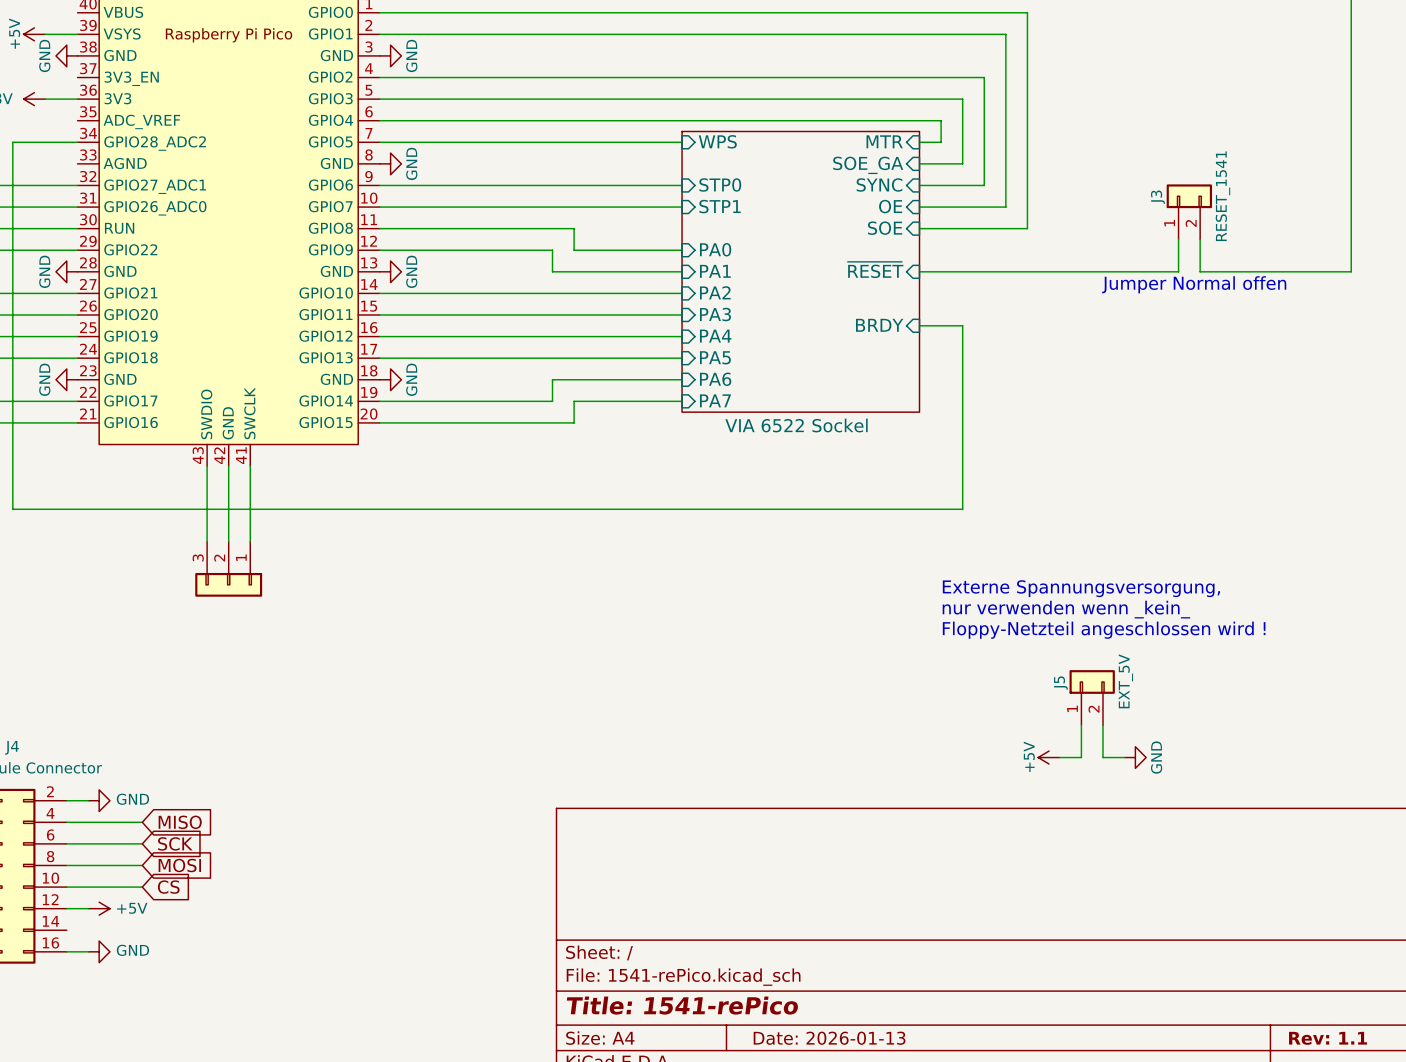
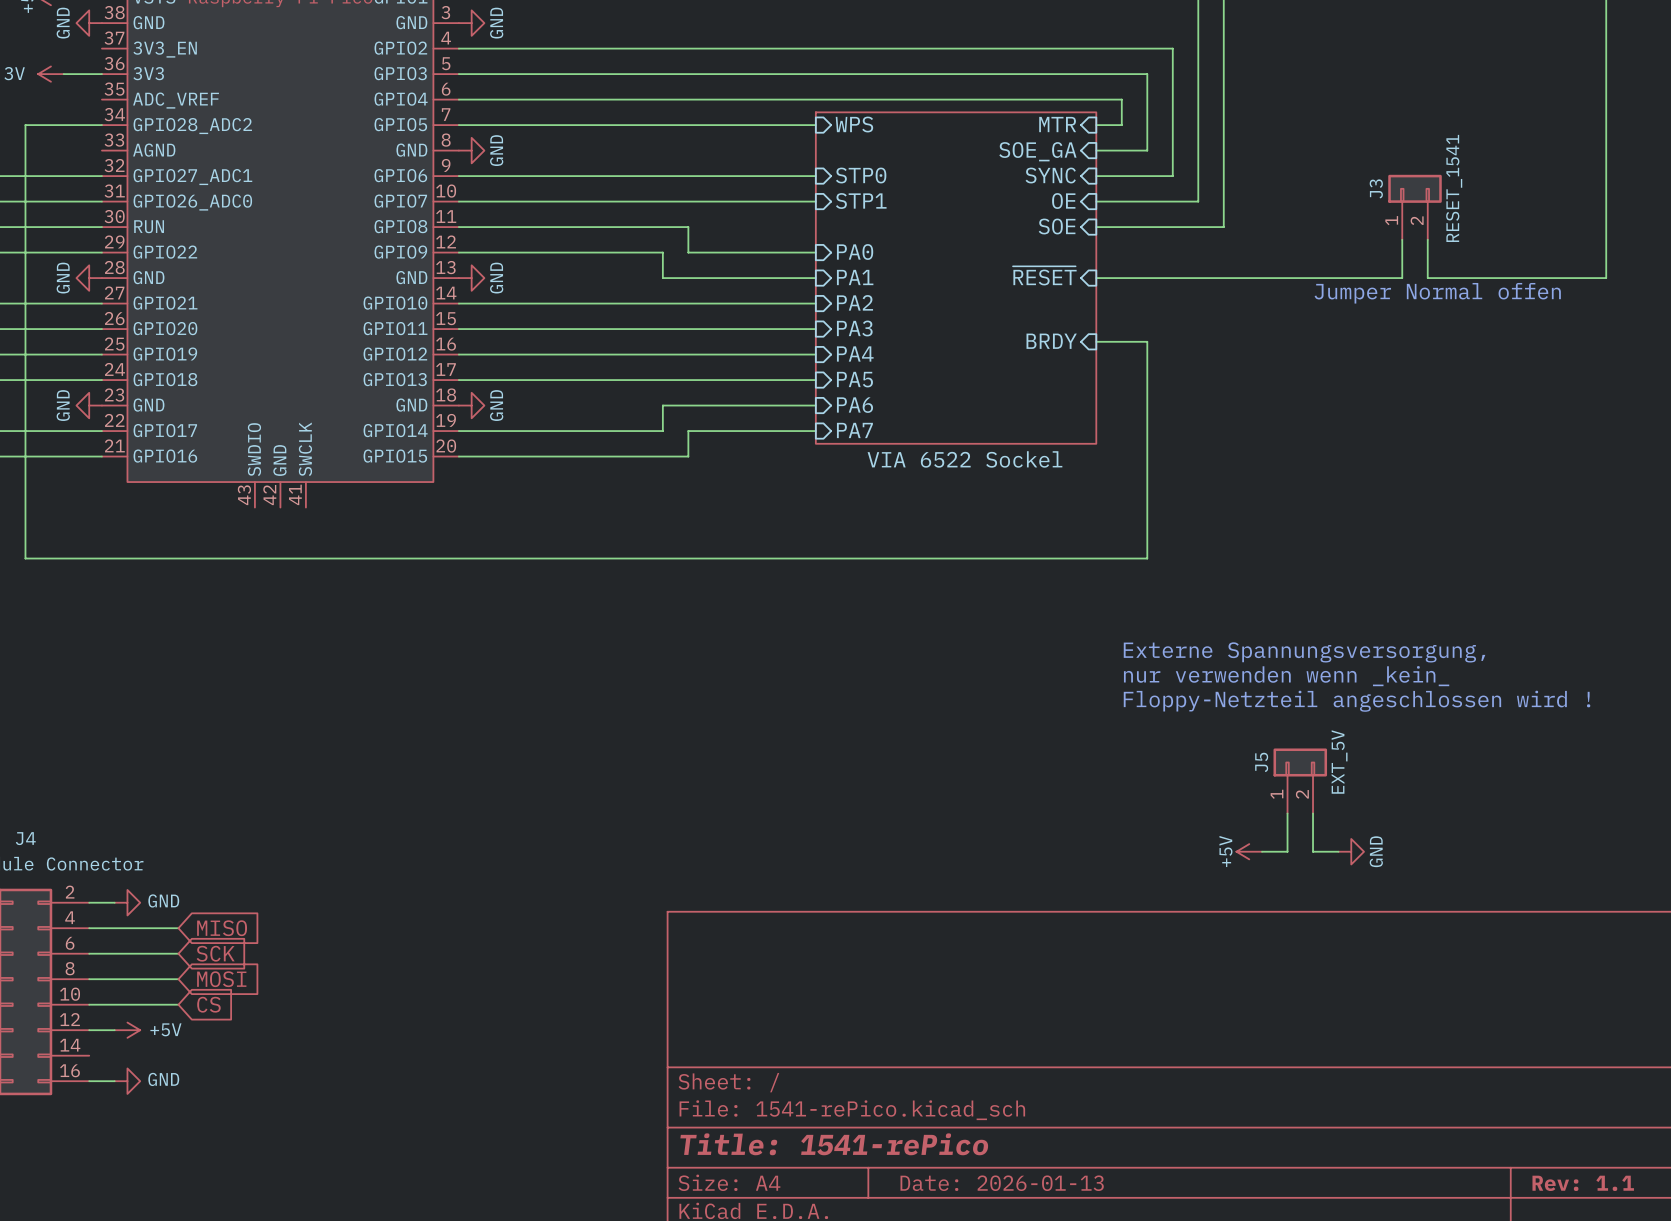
wire: (207, 466) (207, 541) -> none
wire: (228, 466) (228, 541) -> none
wire: (250, 466) (250, 541) -> none
part: (228, 569) -> none

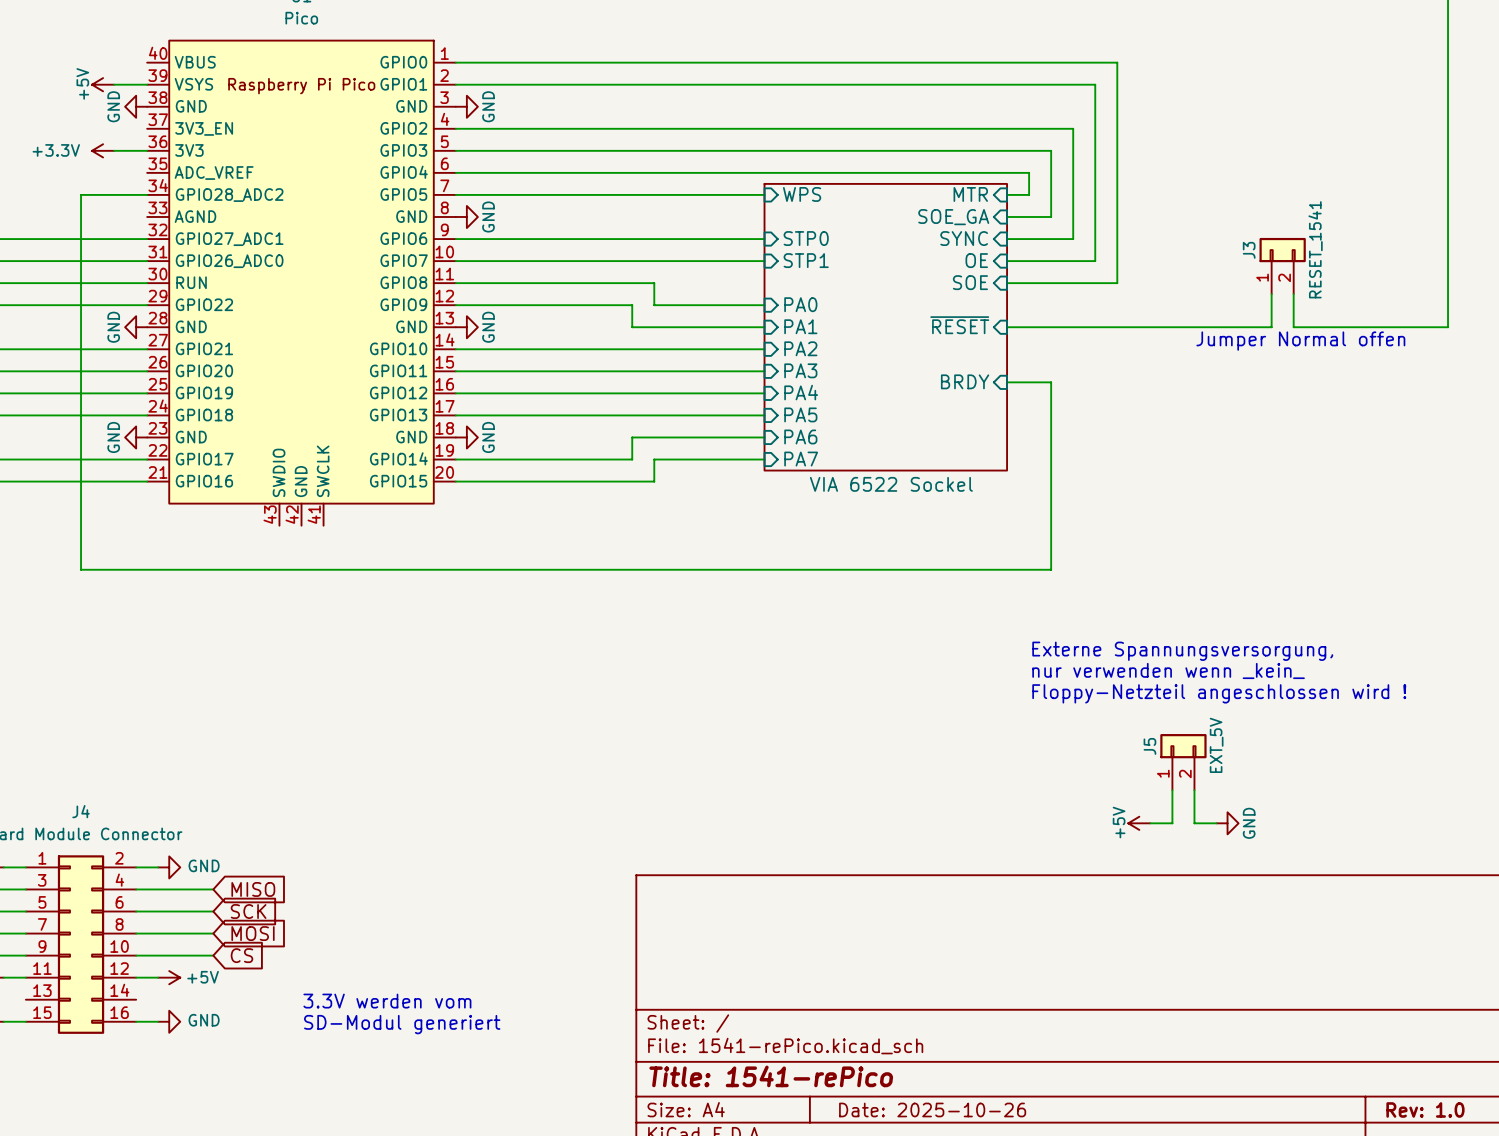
text: none -> 3.3V werden vom (387, 1001)
text: none -> SD-Modul generiert (402, 1024)
title block: Date: 2026-01-13 (1002, 1183) -> Date: 2025-10-26 (932, 1109)
title block: Rev: 1.1 (1583, 1183) -> Rev: 1.0 (1425, 1109)

